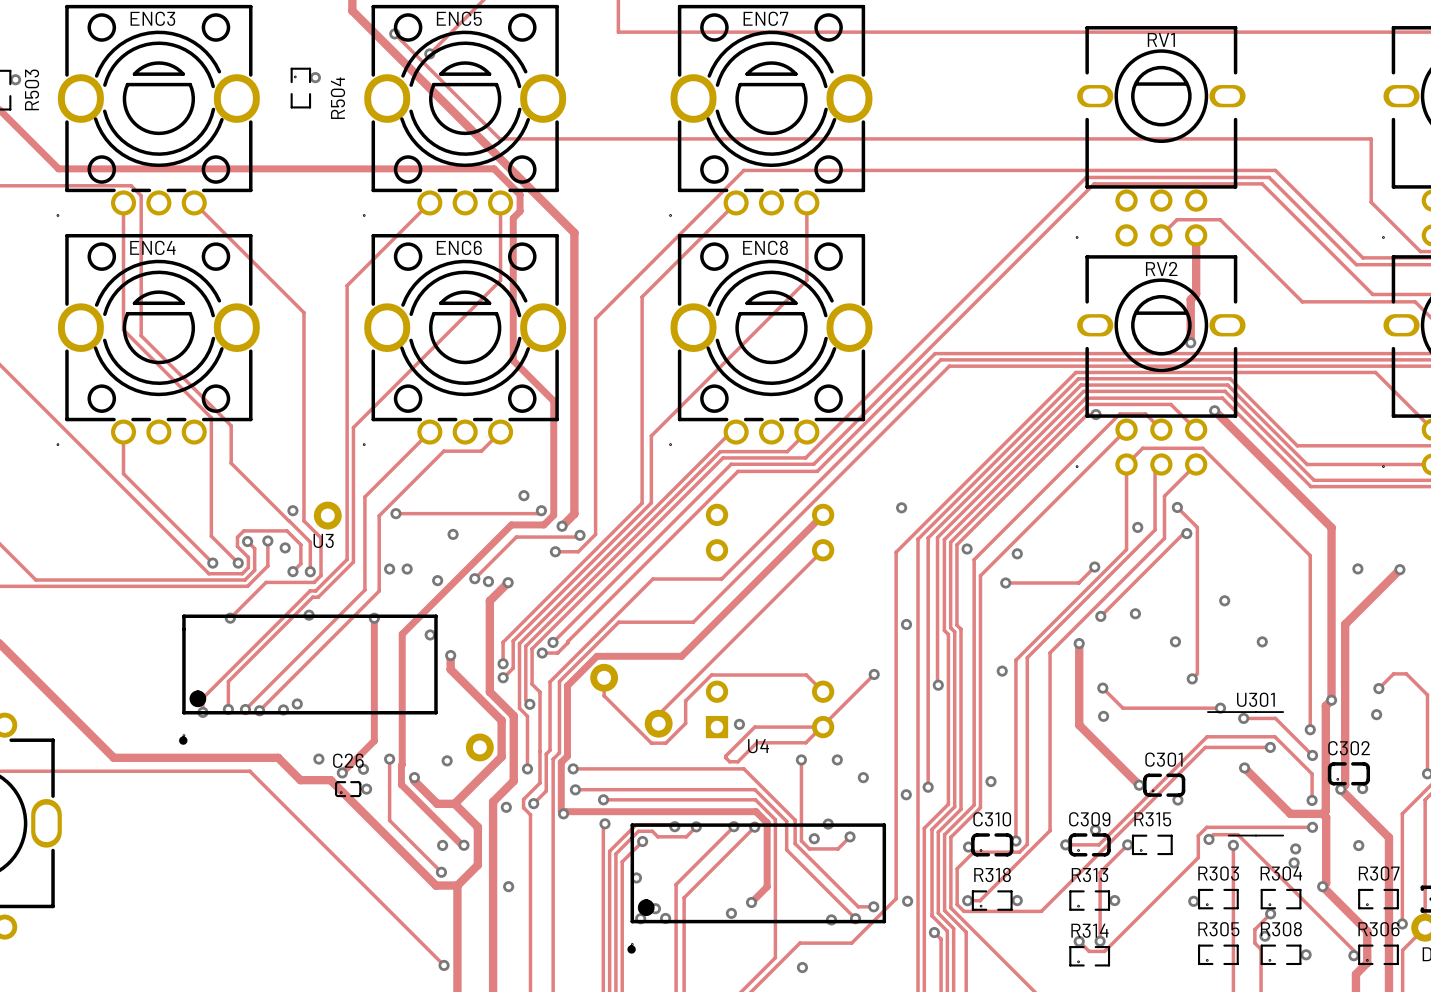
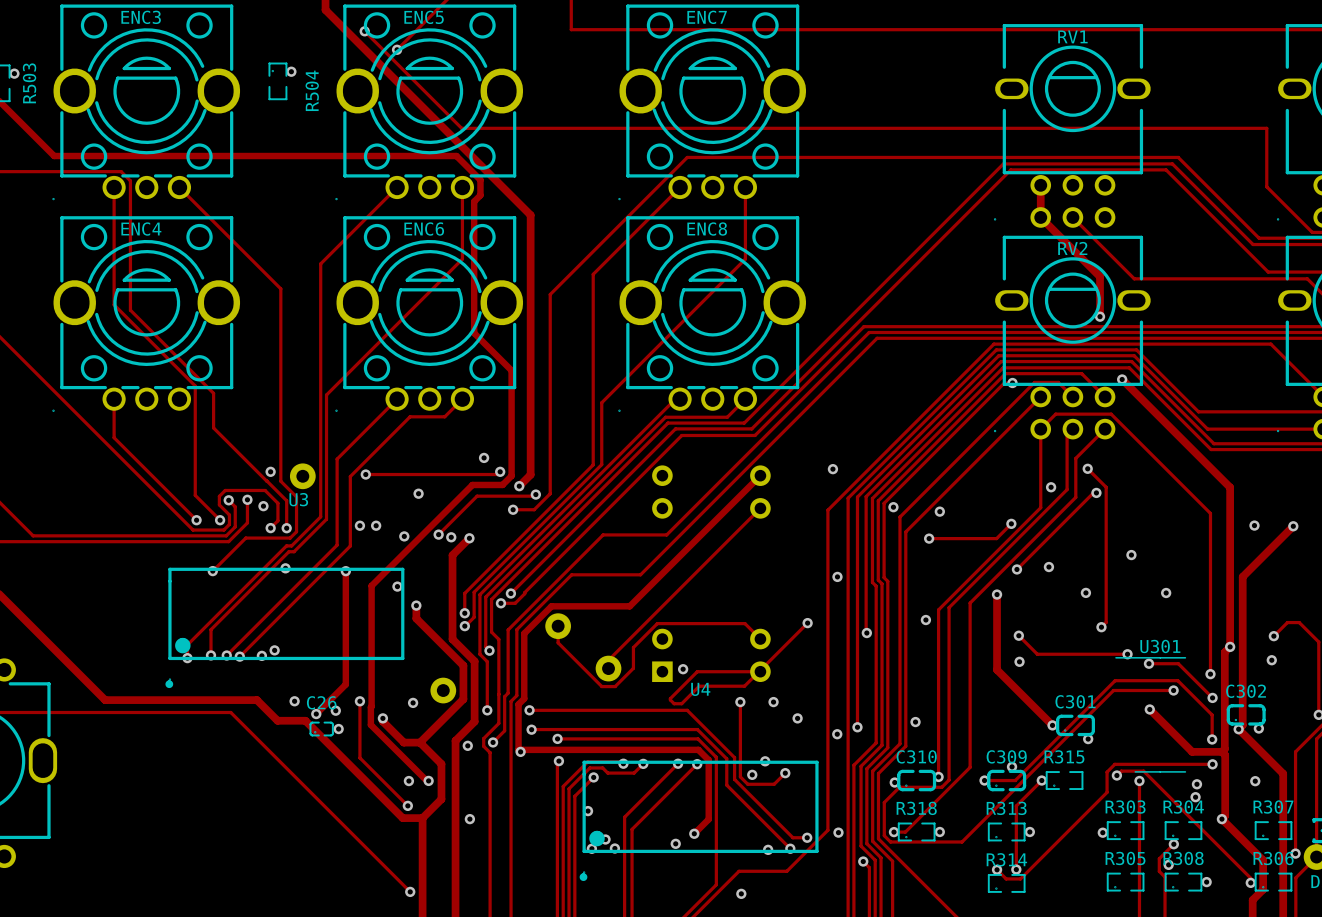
track: (1161, 235) (1177, 219) (1220, 219) (1302, 301) -> (1072, 217) (1134, 278) (1203, 278)
track: (1196, 235) (1196, 294) (1190, 299) -> (1040, 185) (1040, 217) (1100, 276)

